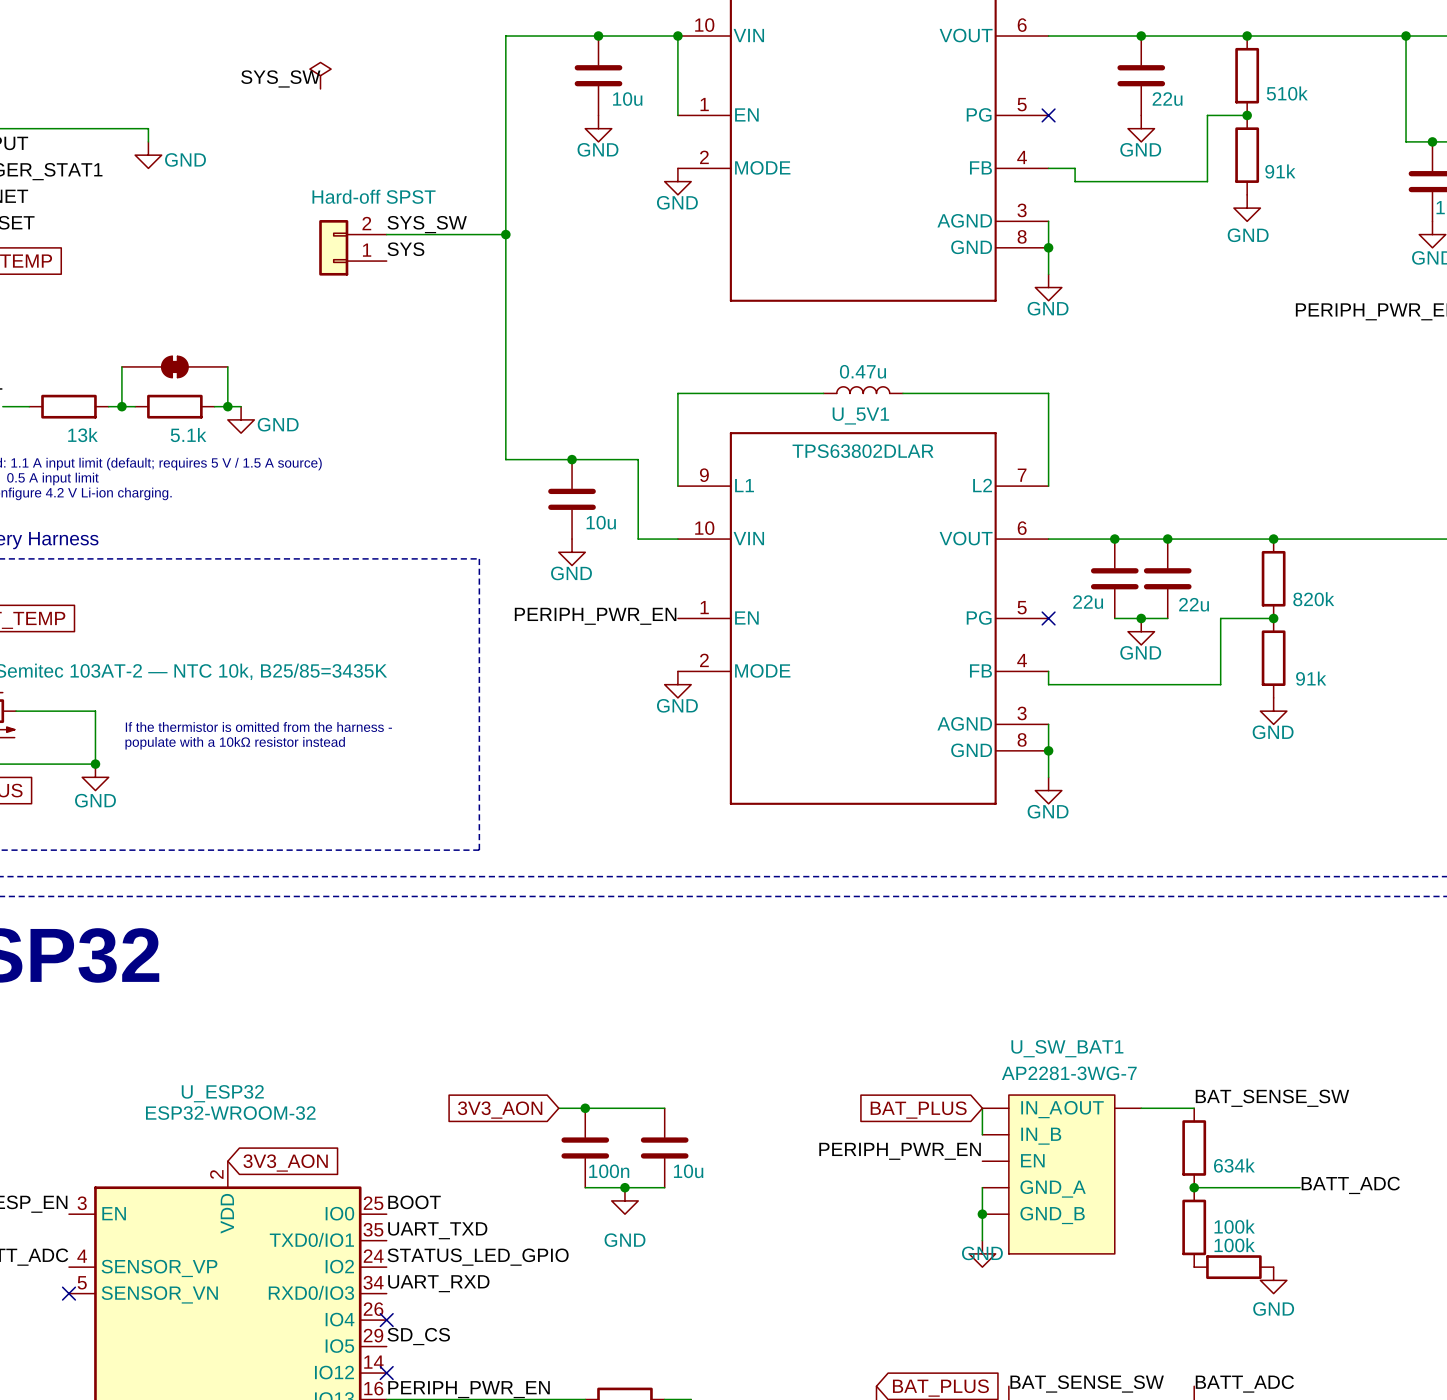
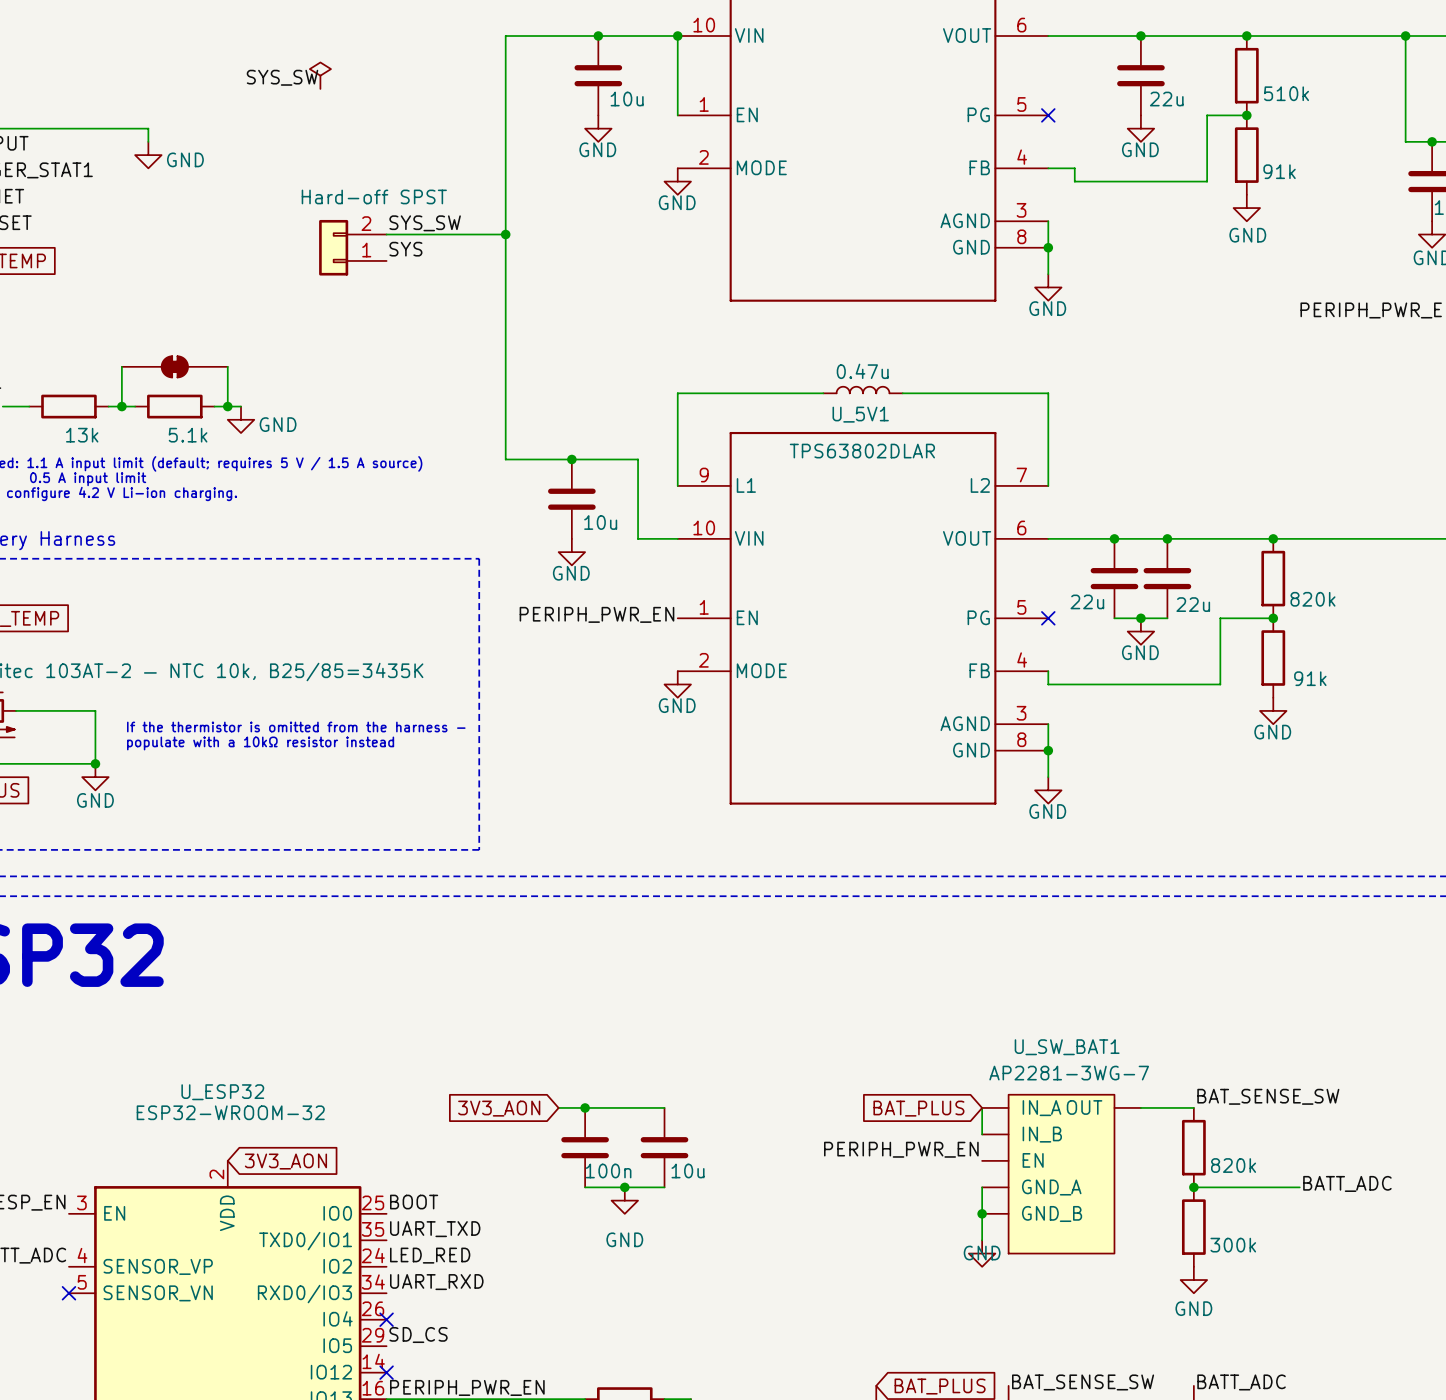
part value: 634k (1234, 1165) -> 820k (1233, 1165)
part value: 100k (1234, 1245) -> 300k (1233, 1245)
label: STATUS_LED_GPIO (478, 1257) -> LED_RED (430, 1255)
part: 100k (1233, 1267) -> none
power symbol position: GND (1273, 1280) -> GND (1193, 1280)

